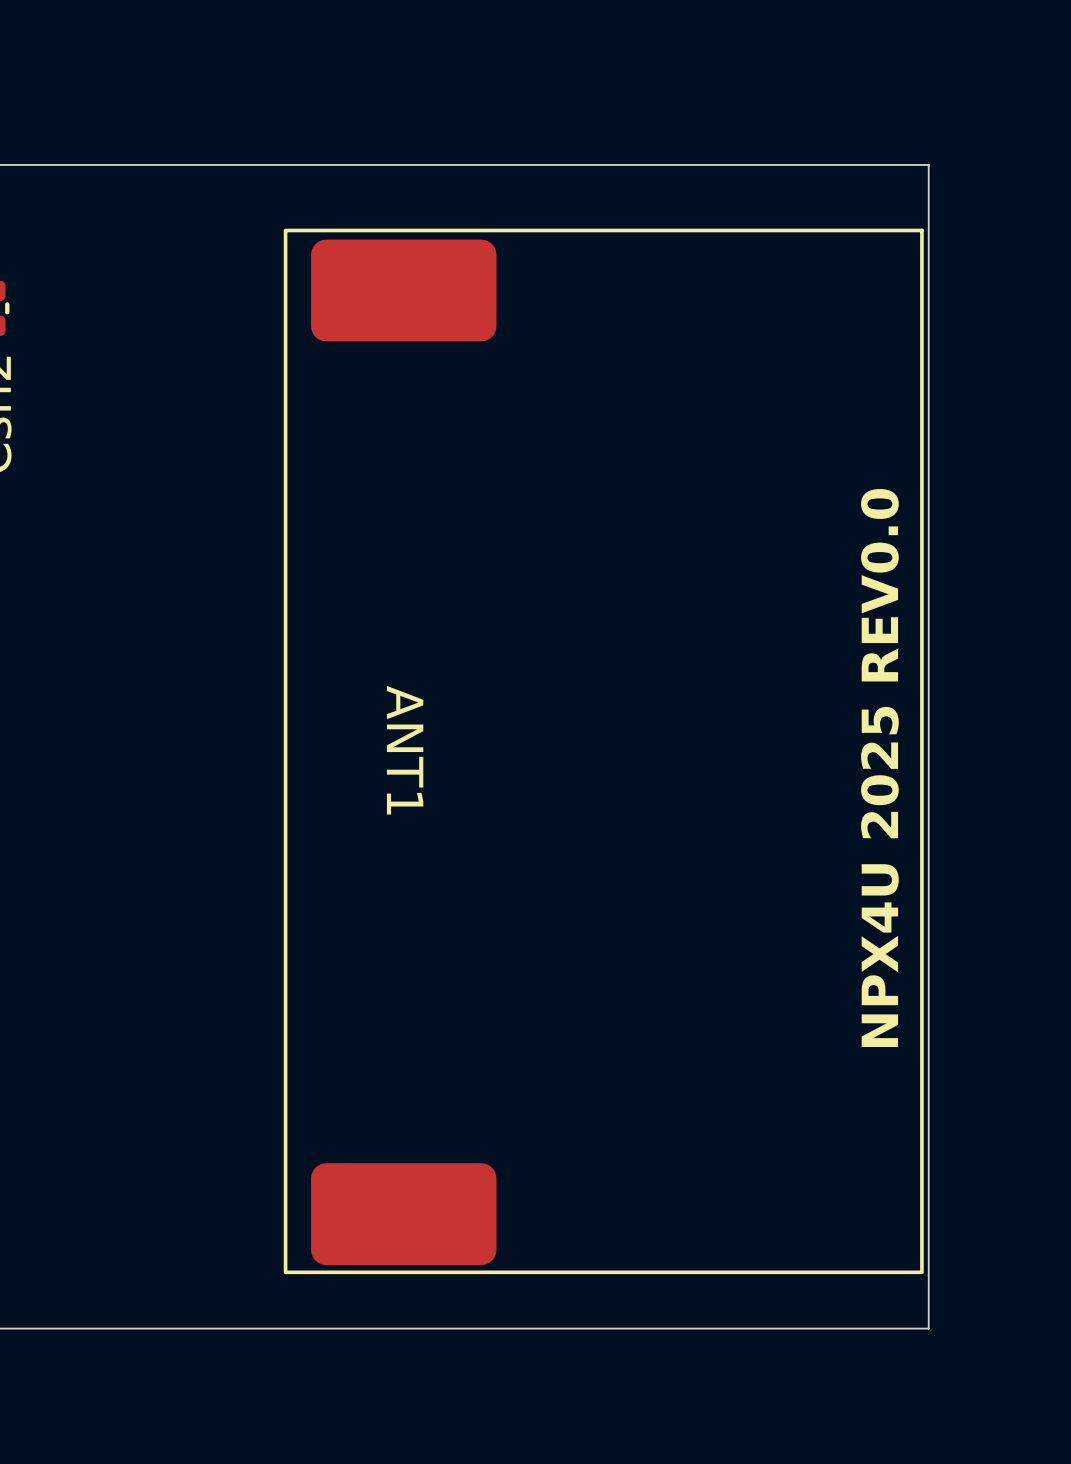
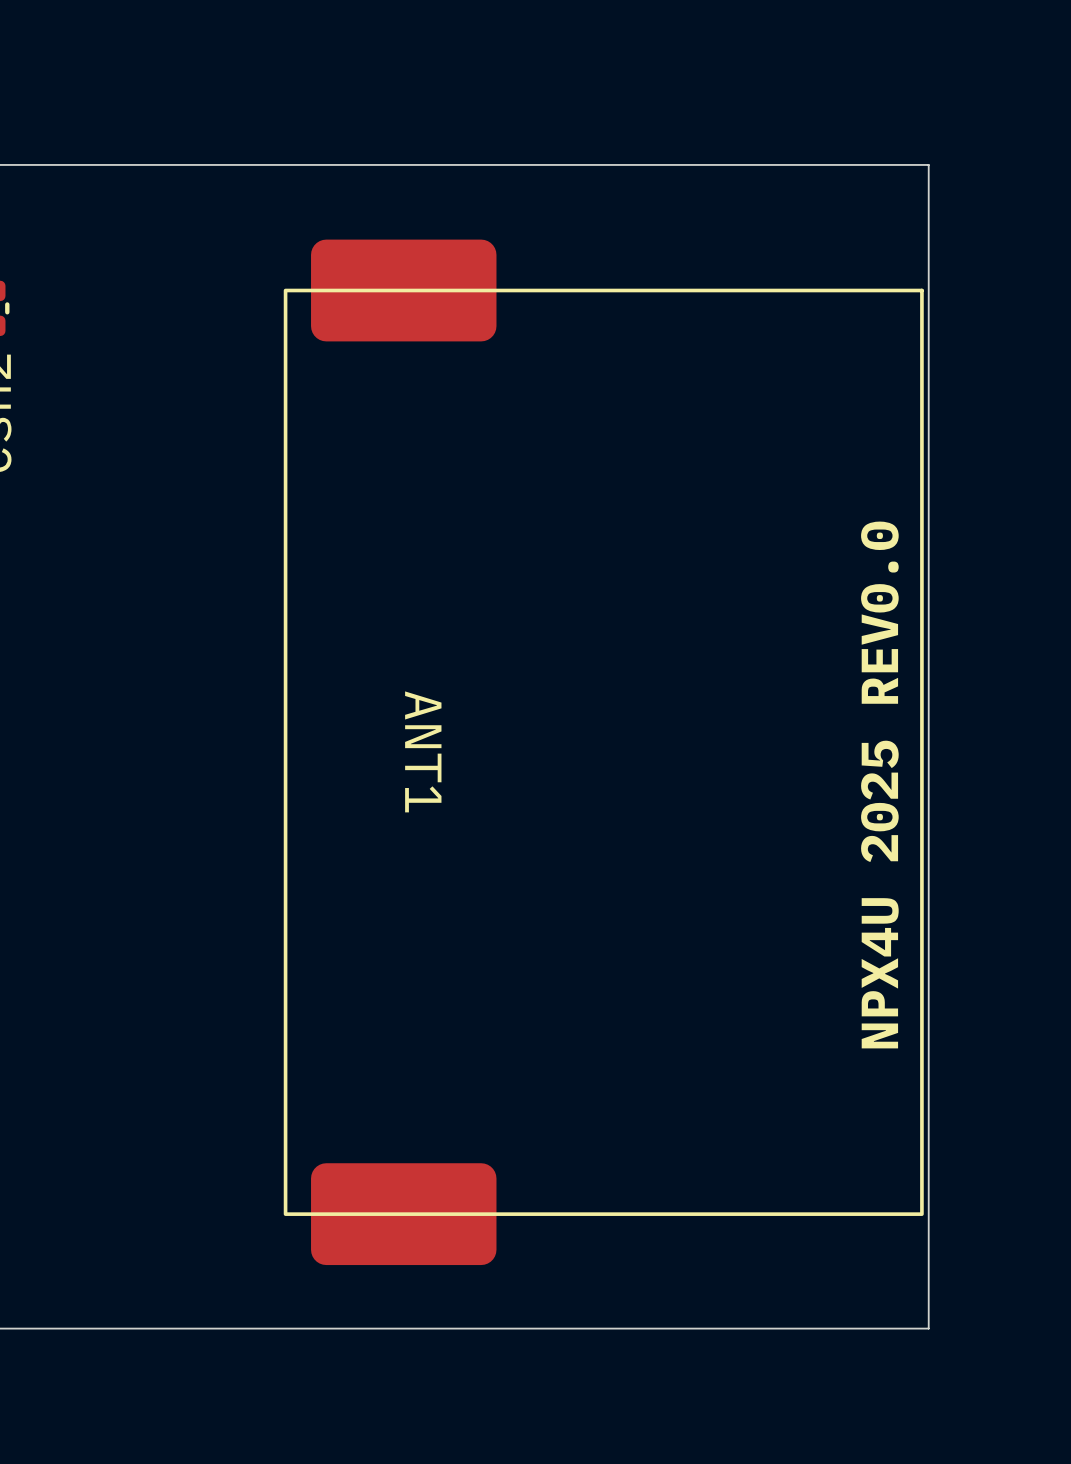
ANT1 footprint: [283, 228, 924, 1275] -> [283, 239, 924, 1266]

